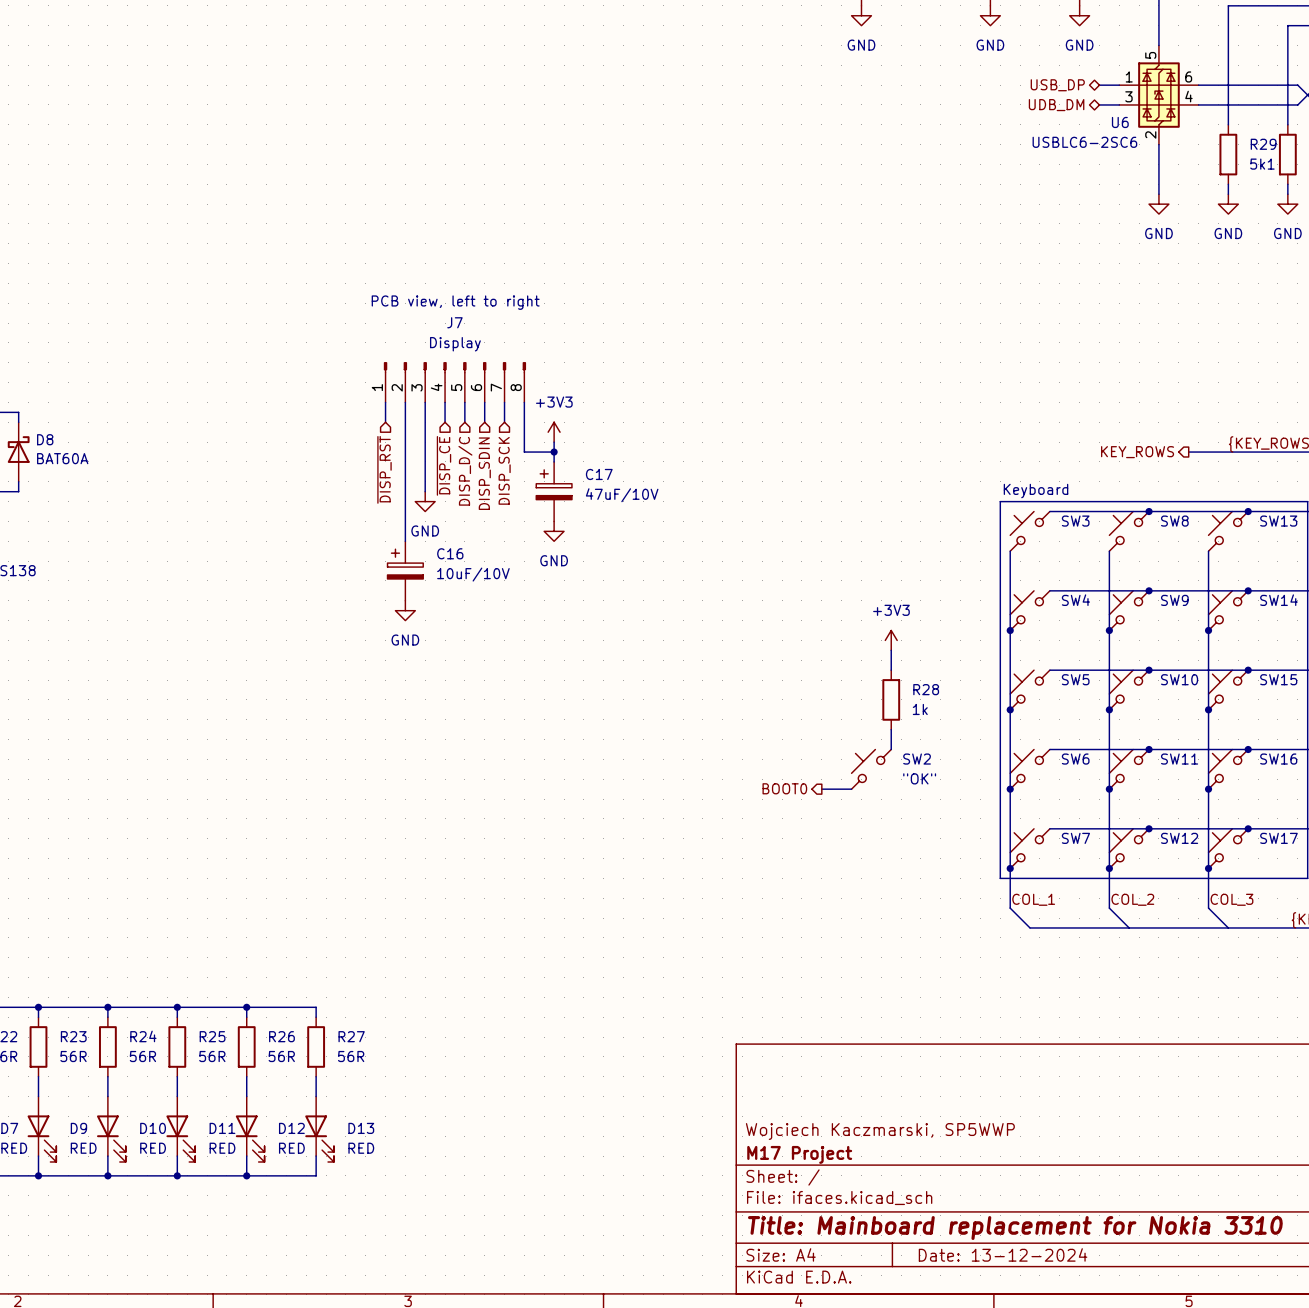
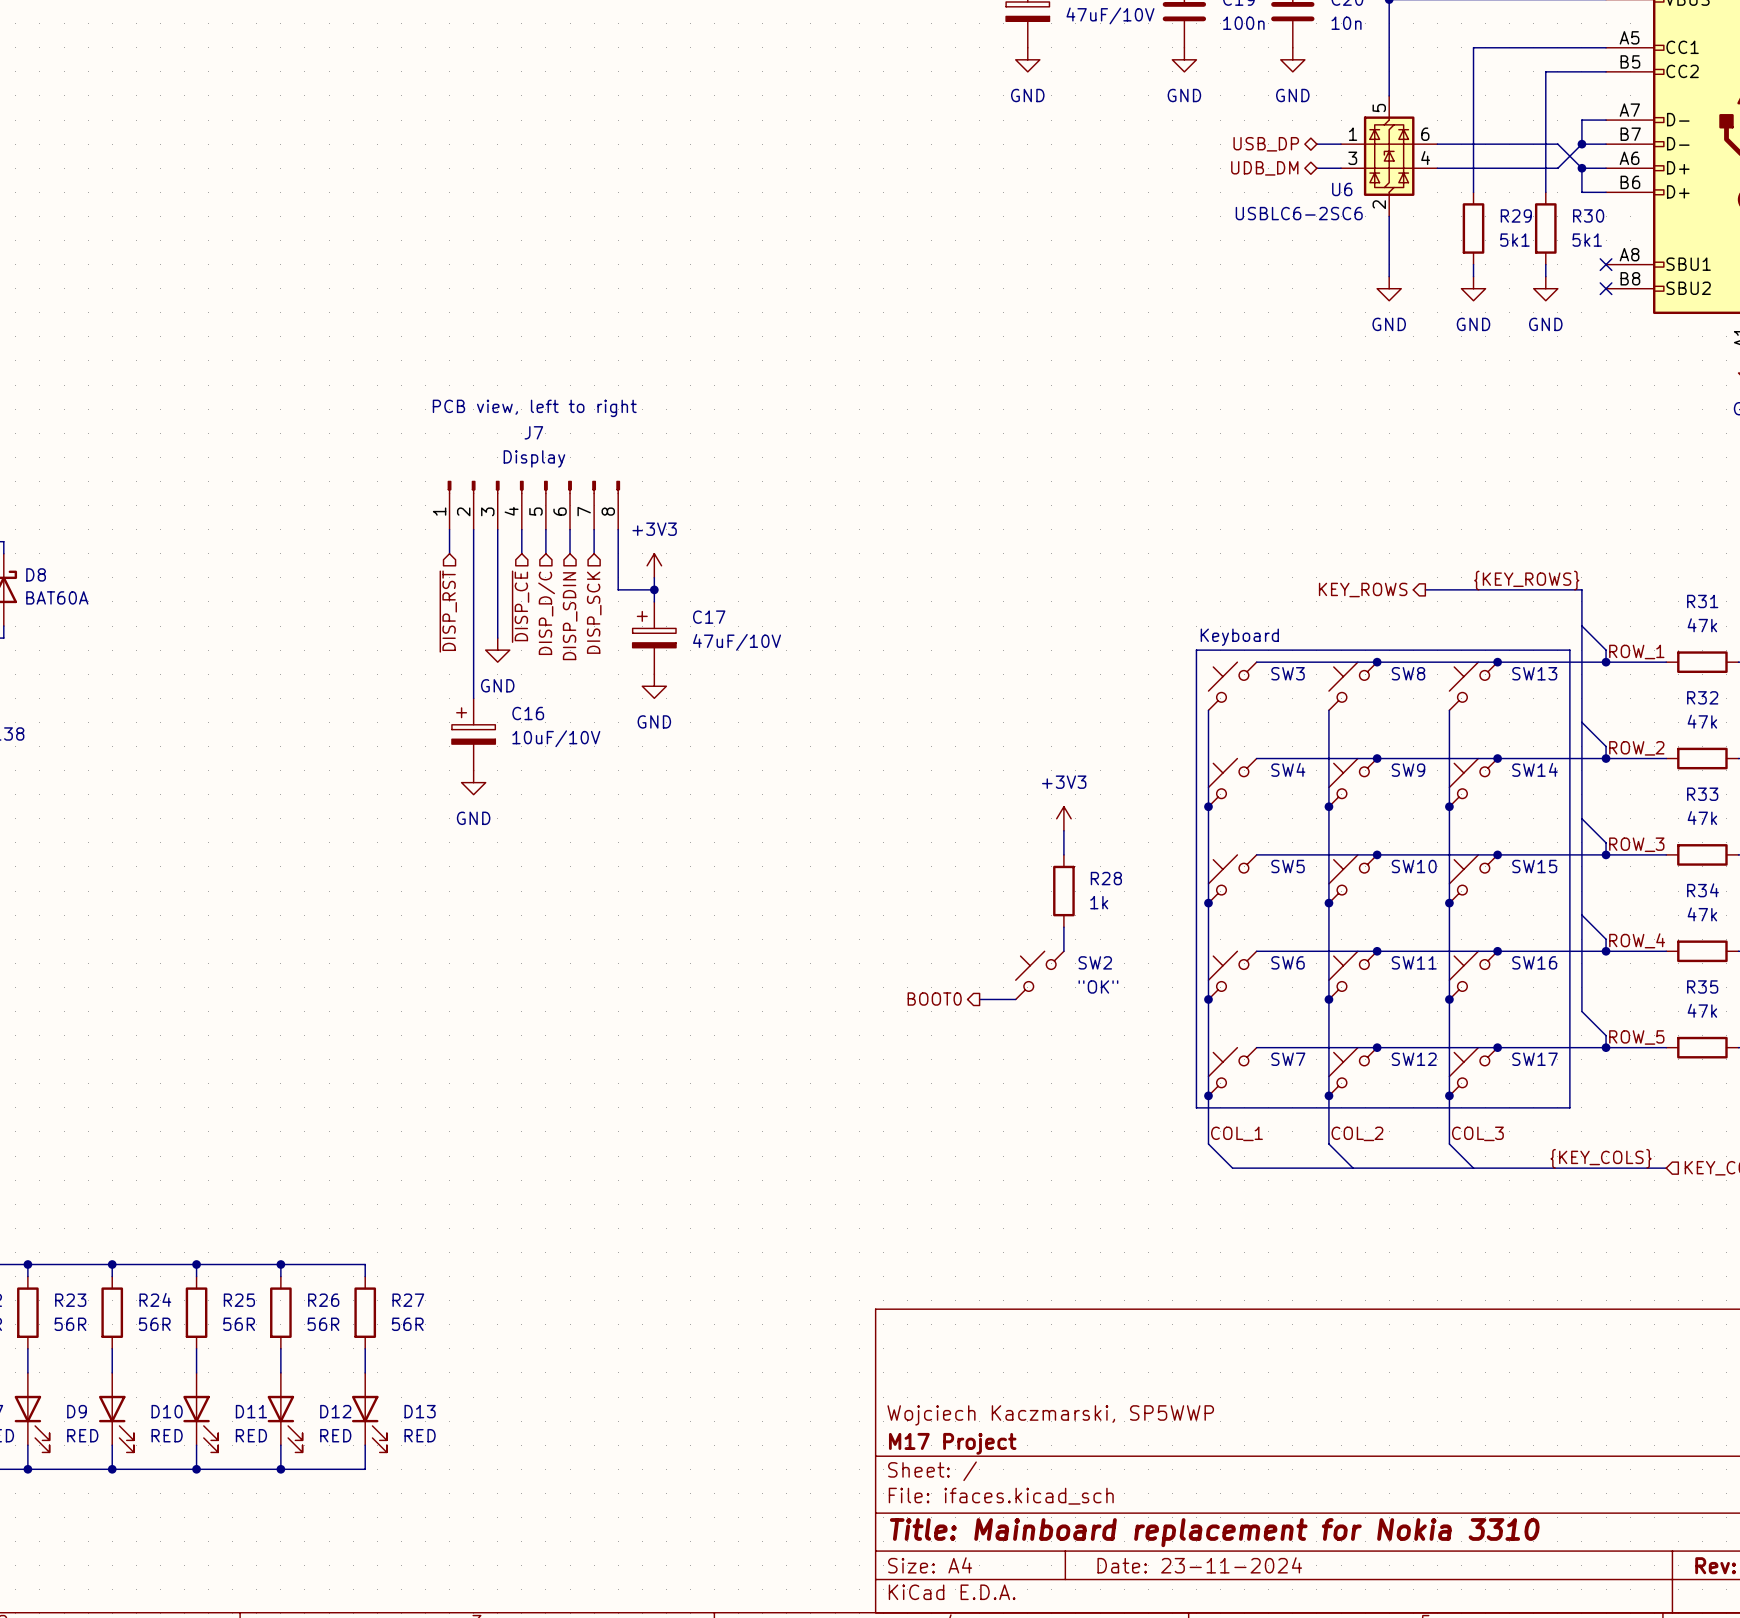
title block: Date: 13-12-2024 (1003, 1254) -> Date: 23-11-2024 (1199, 1565)

